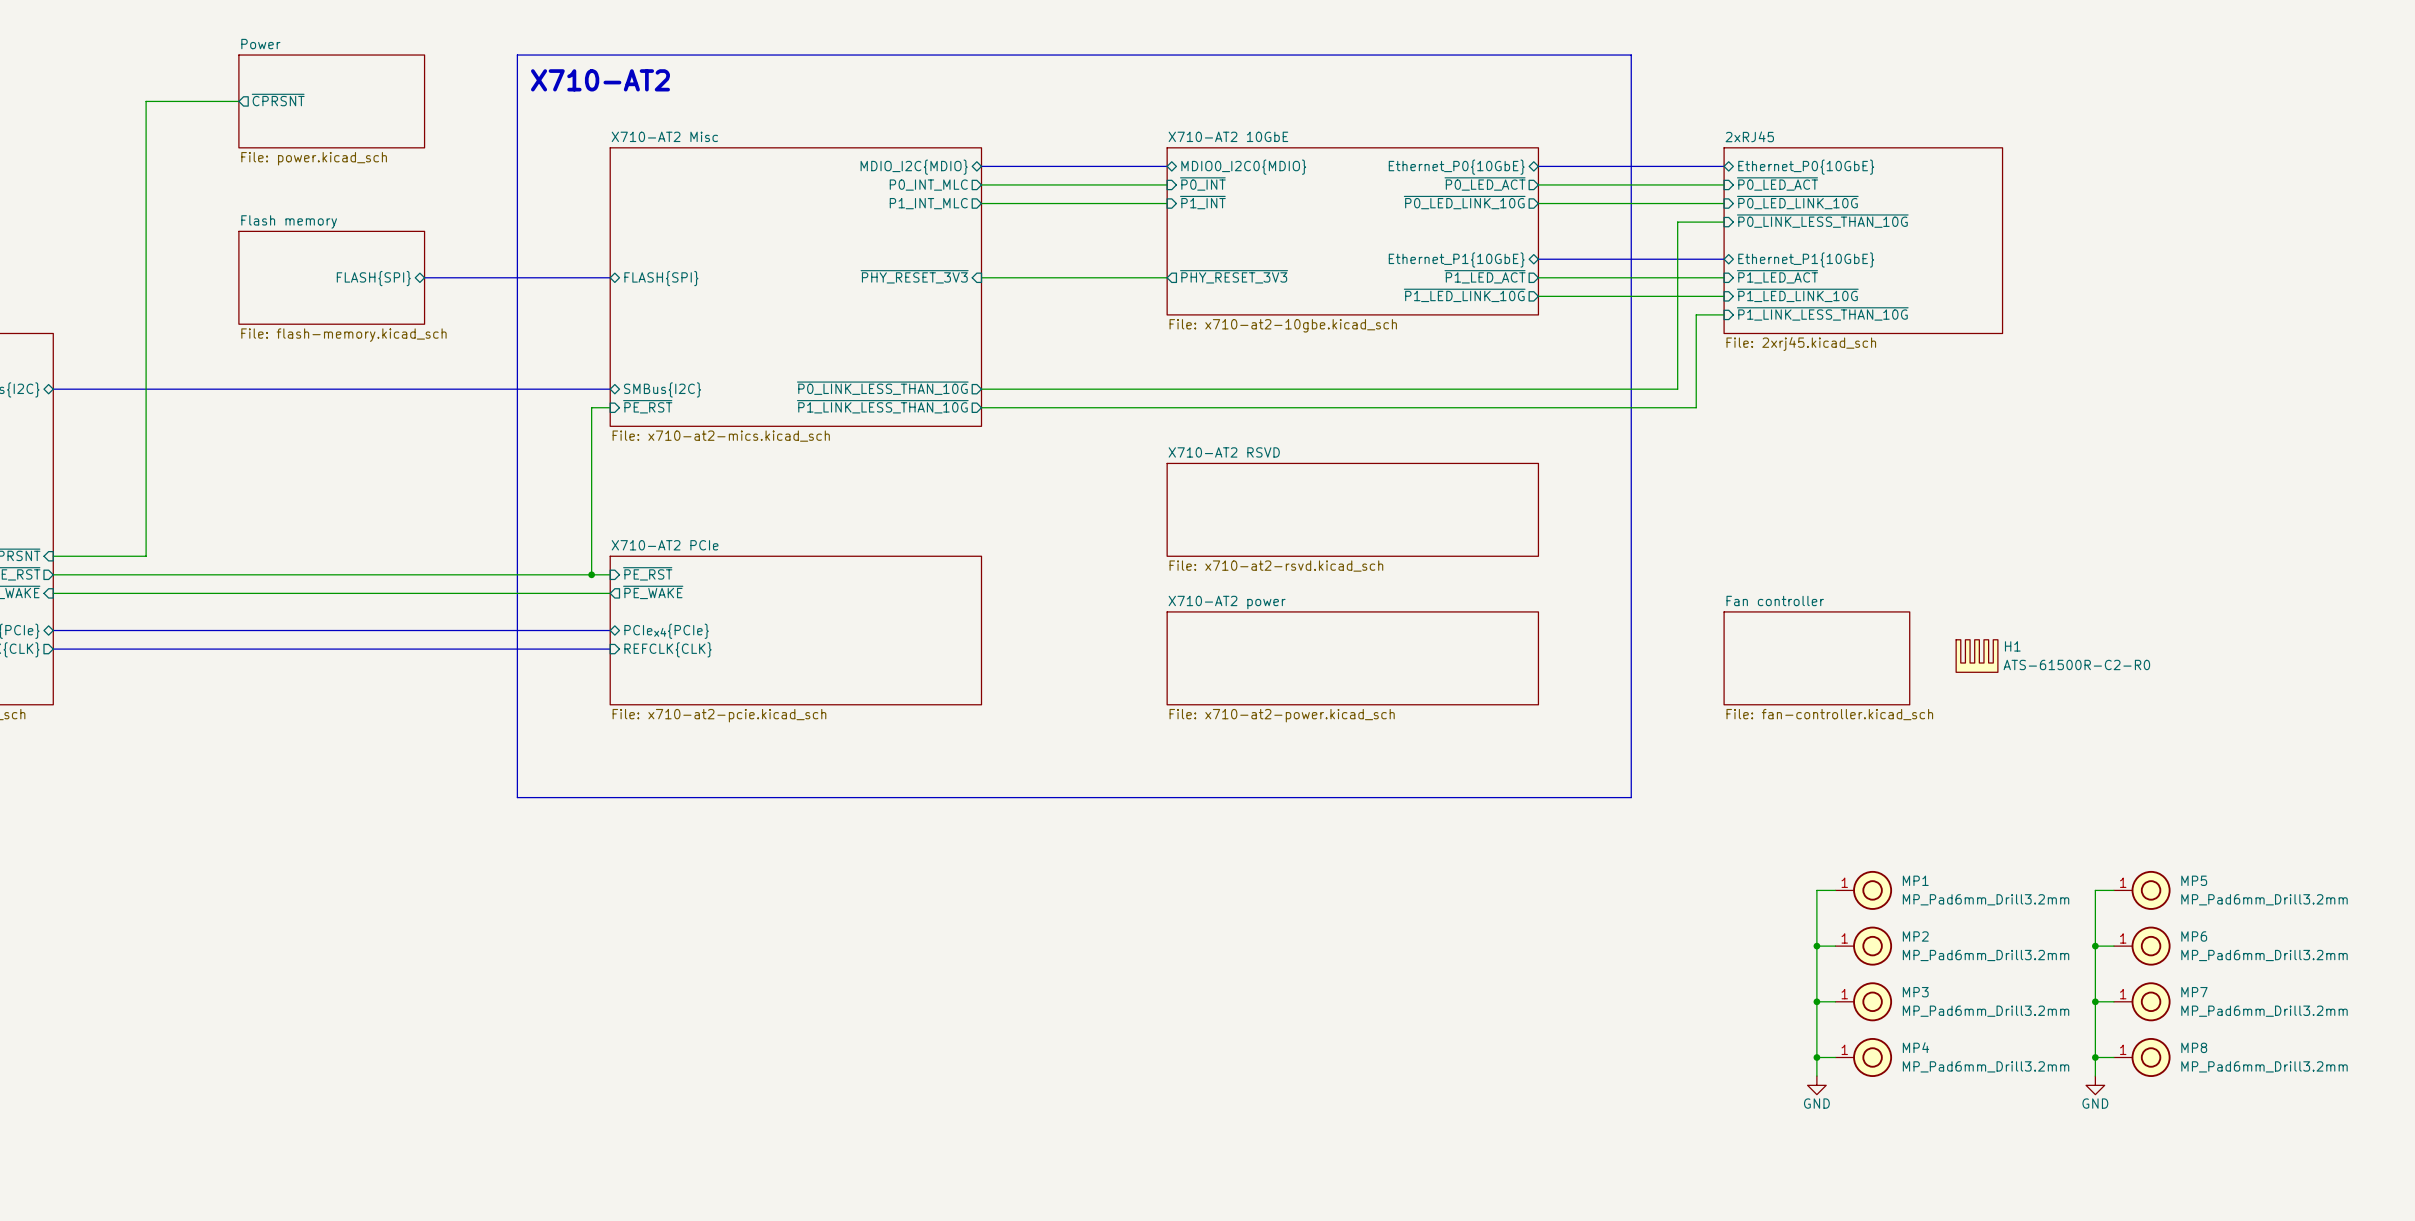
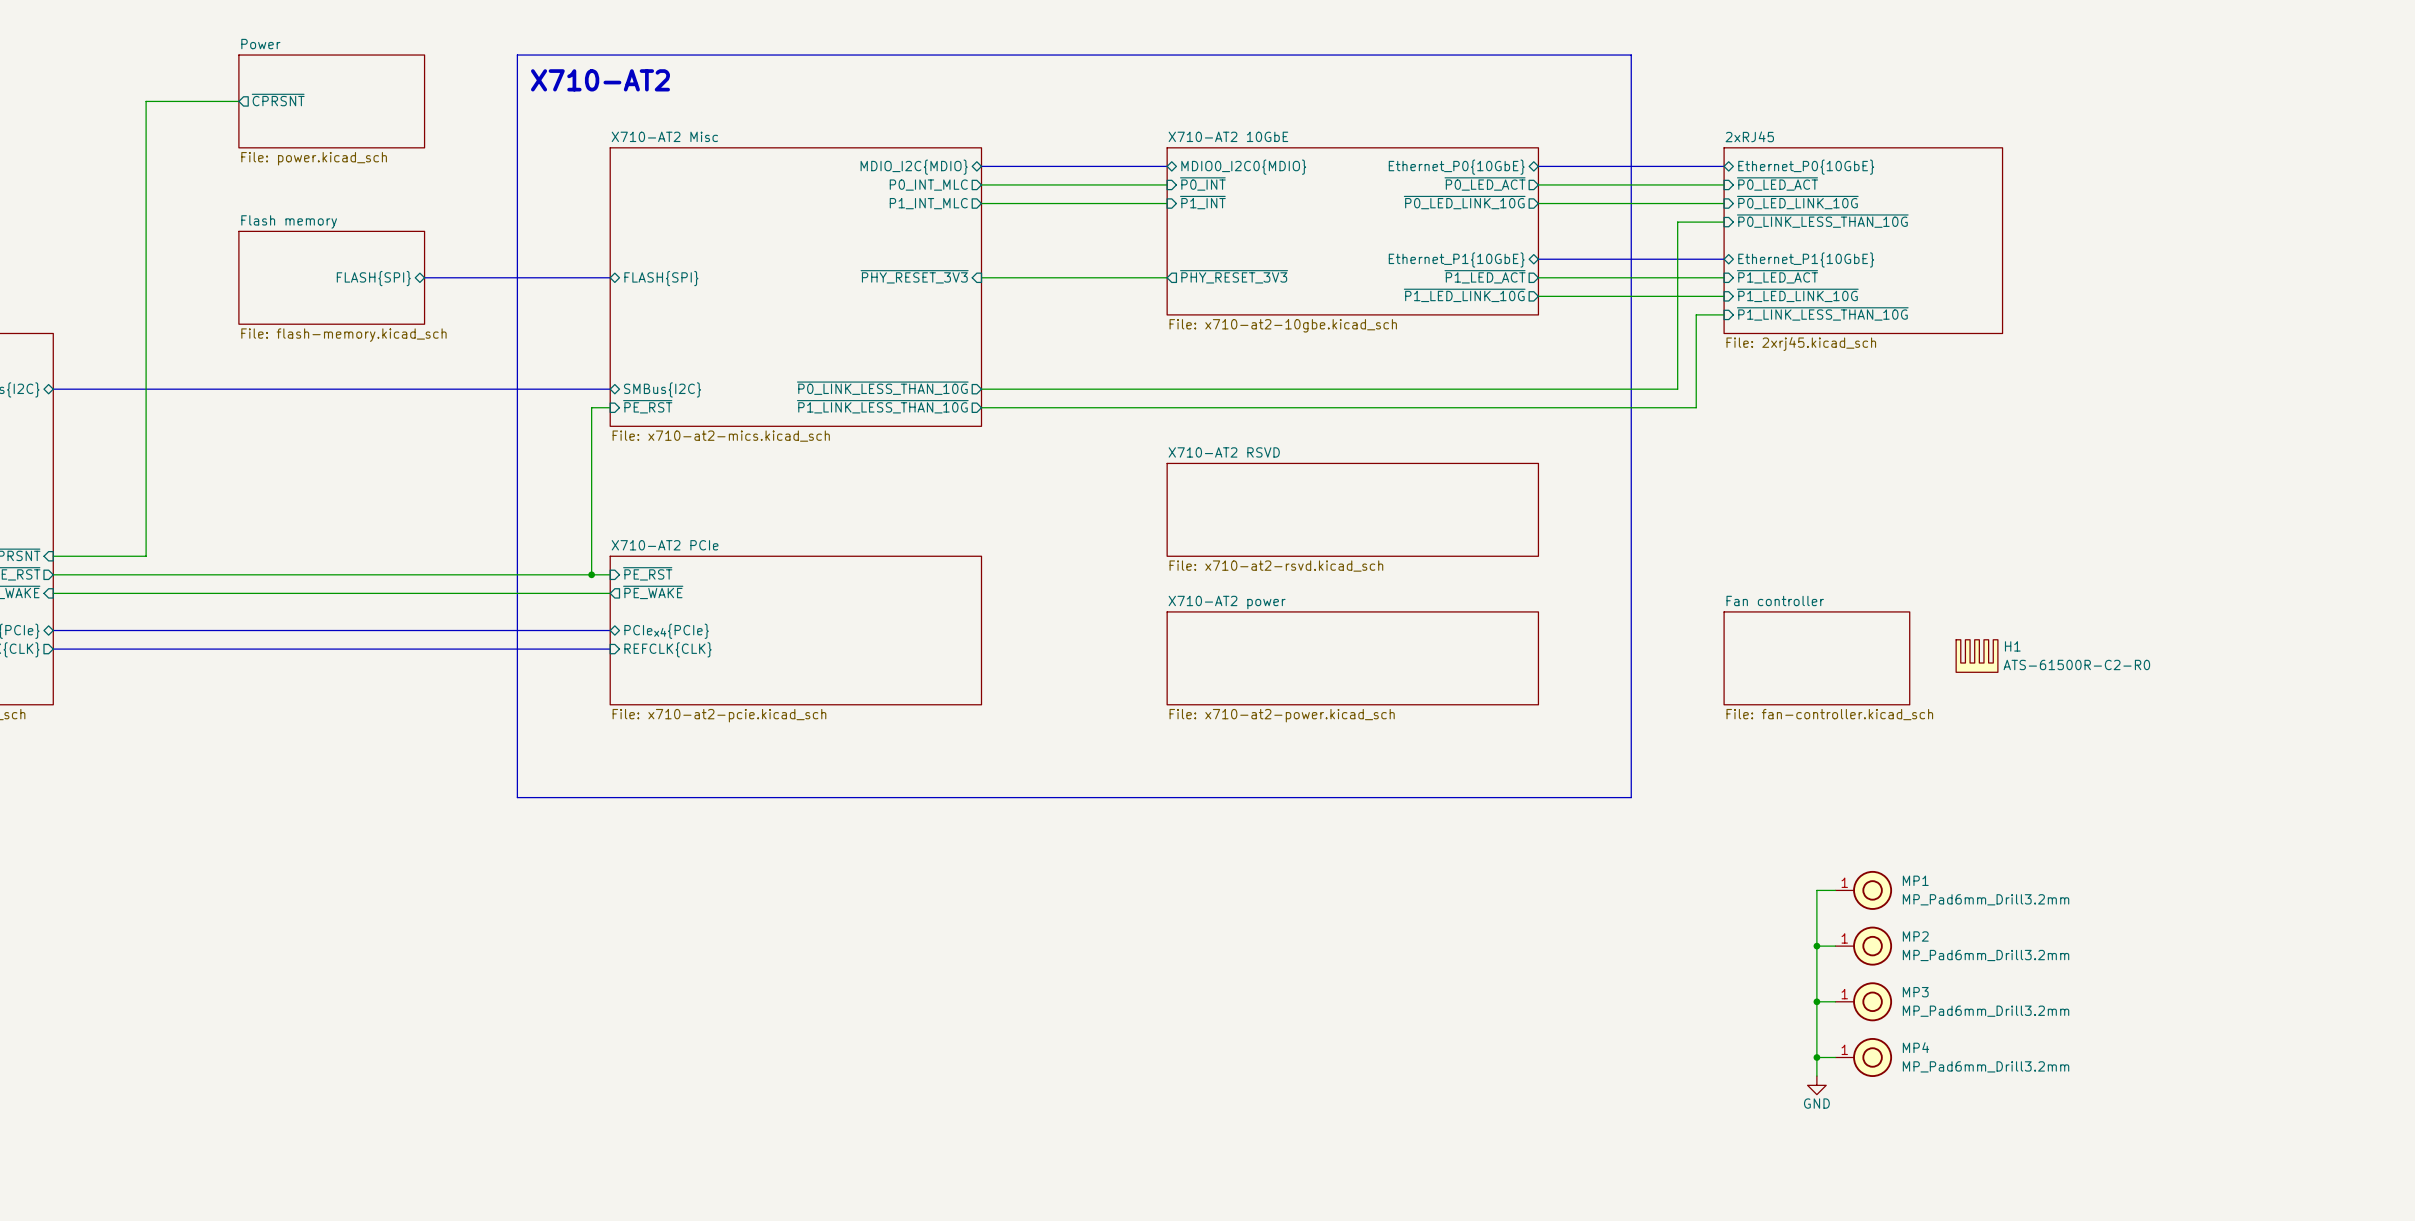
wire: (2113, 890) (2095, 890) (2095, 1076) -> none
MP5: MP_Pad6mm_Drill3.2mm (2142, 890) -> none
wire: (2095, 946) (2113, 946) -> none
junction: (2095, 946) -> none
MP6: MP_Pad6mm_Drill3.2mm (2142, 946) -> none
wire: (2095, 1001) (2113, 1001) -> none
junction: (2095, 1001) -> none
MP7: MP_Pad6mm_Drill3.2mm (2142, 1001) -> none
wire: (2095, 1057) (2113, 1057) -> none
junction: (2095, 1057) -> none
MP8: MP_Pad6mm_Drill3.2mm (2142, 1057) -> none
power symbol: GND (2095, 1085) -> none

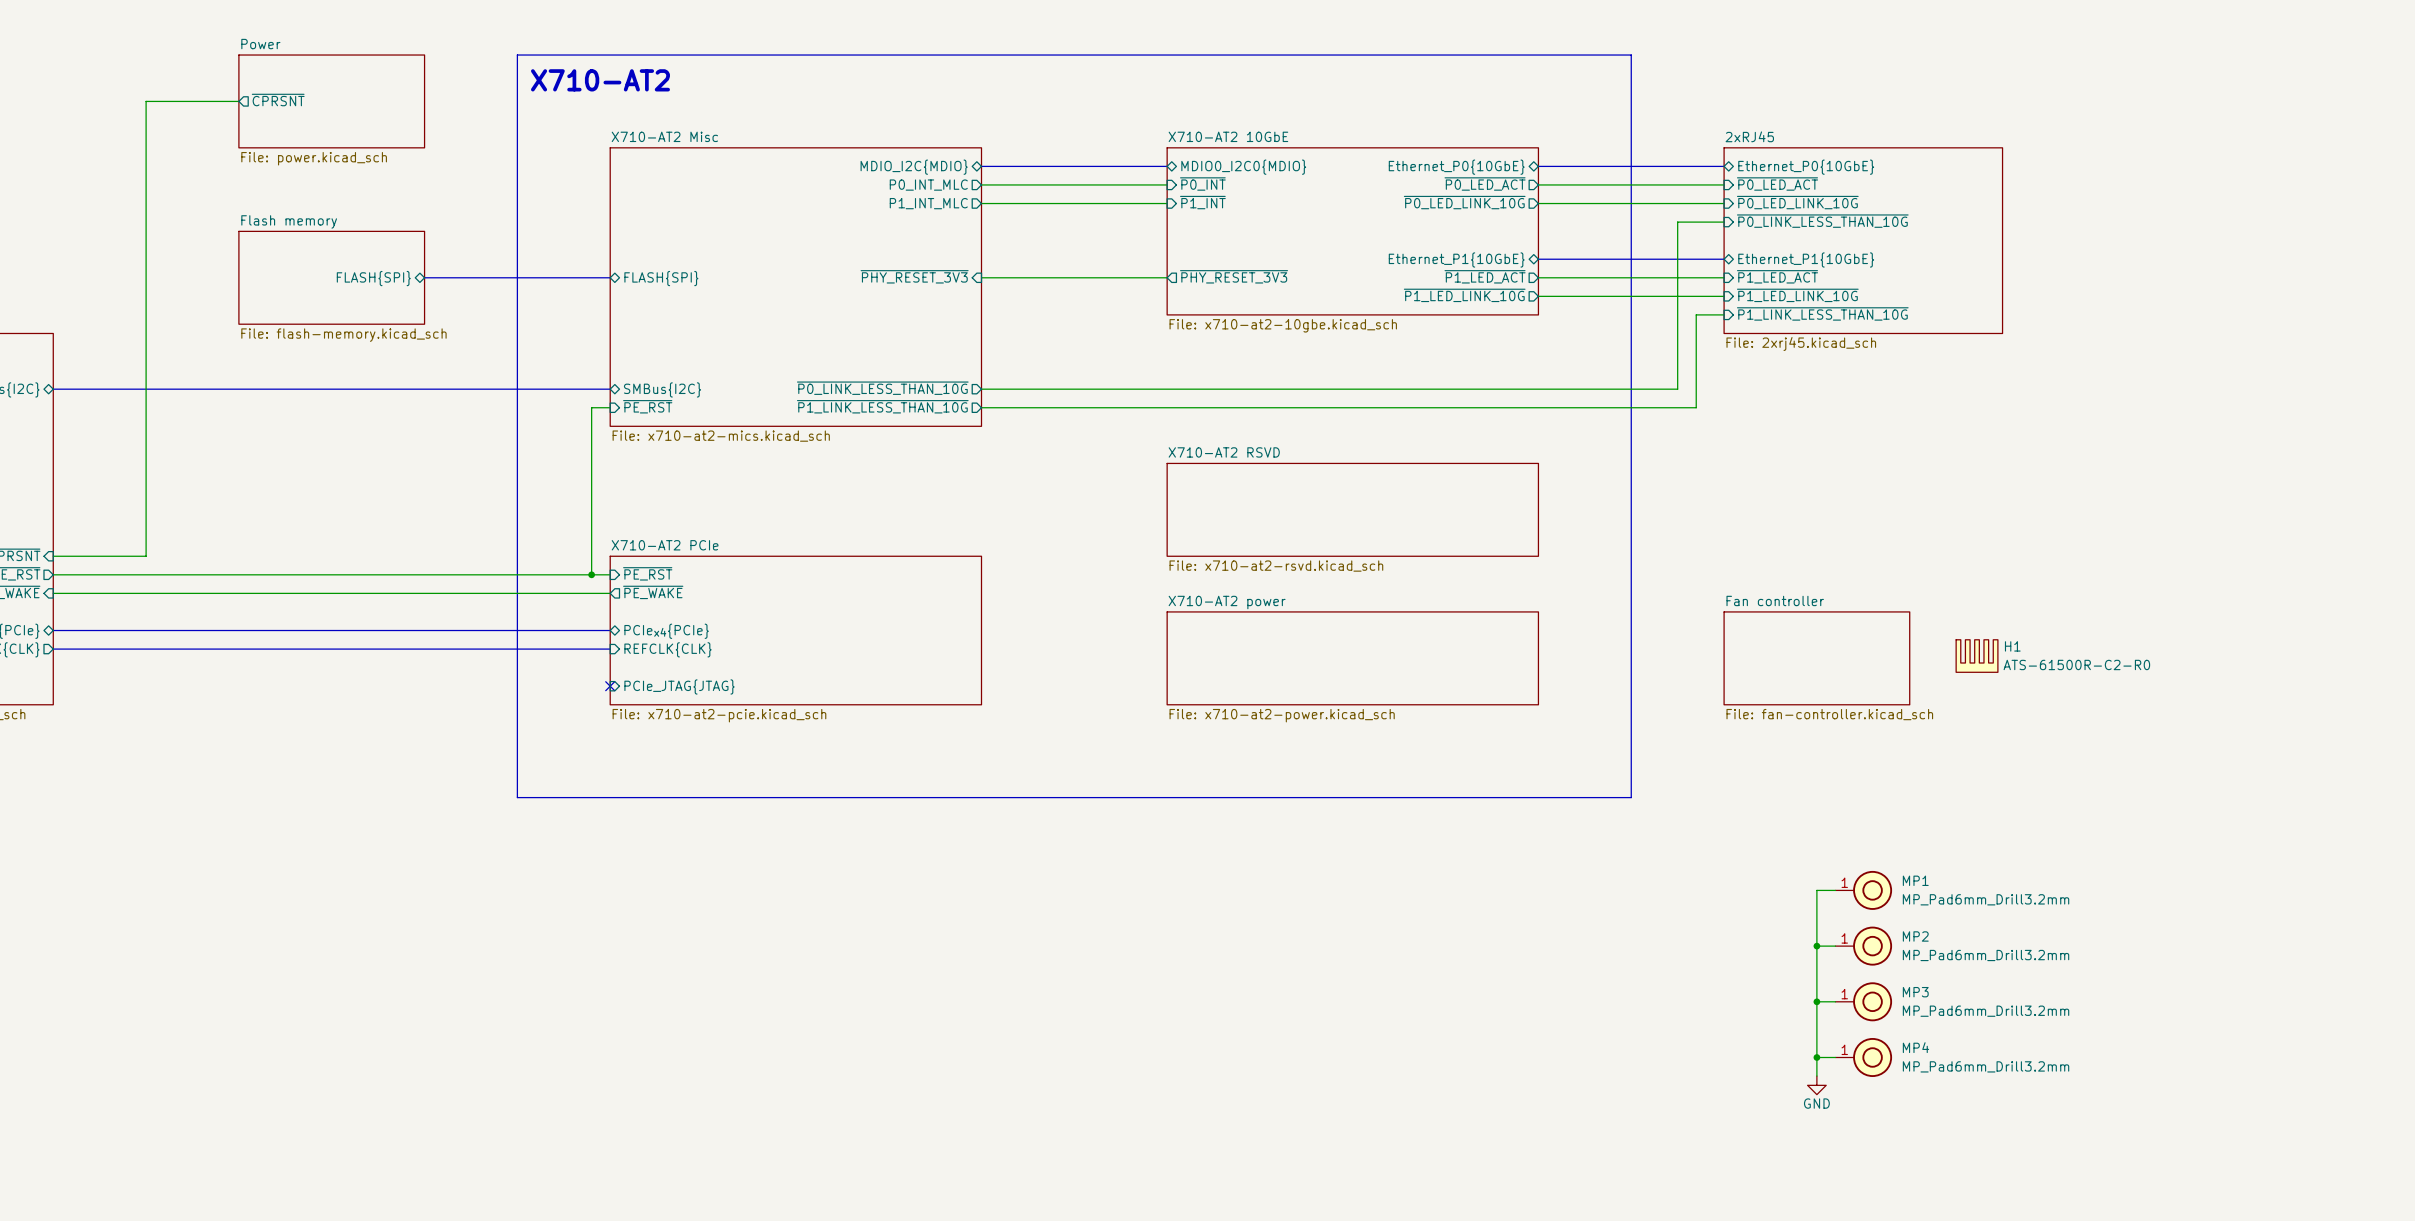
no-connect mark: none -> (610, 686)
sheet pin: none -> PCIe_JTAG{JTAG} (679, 686)

